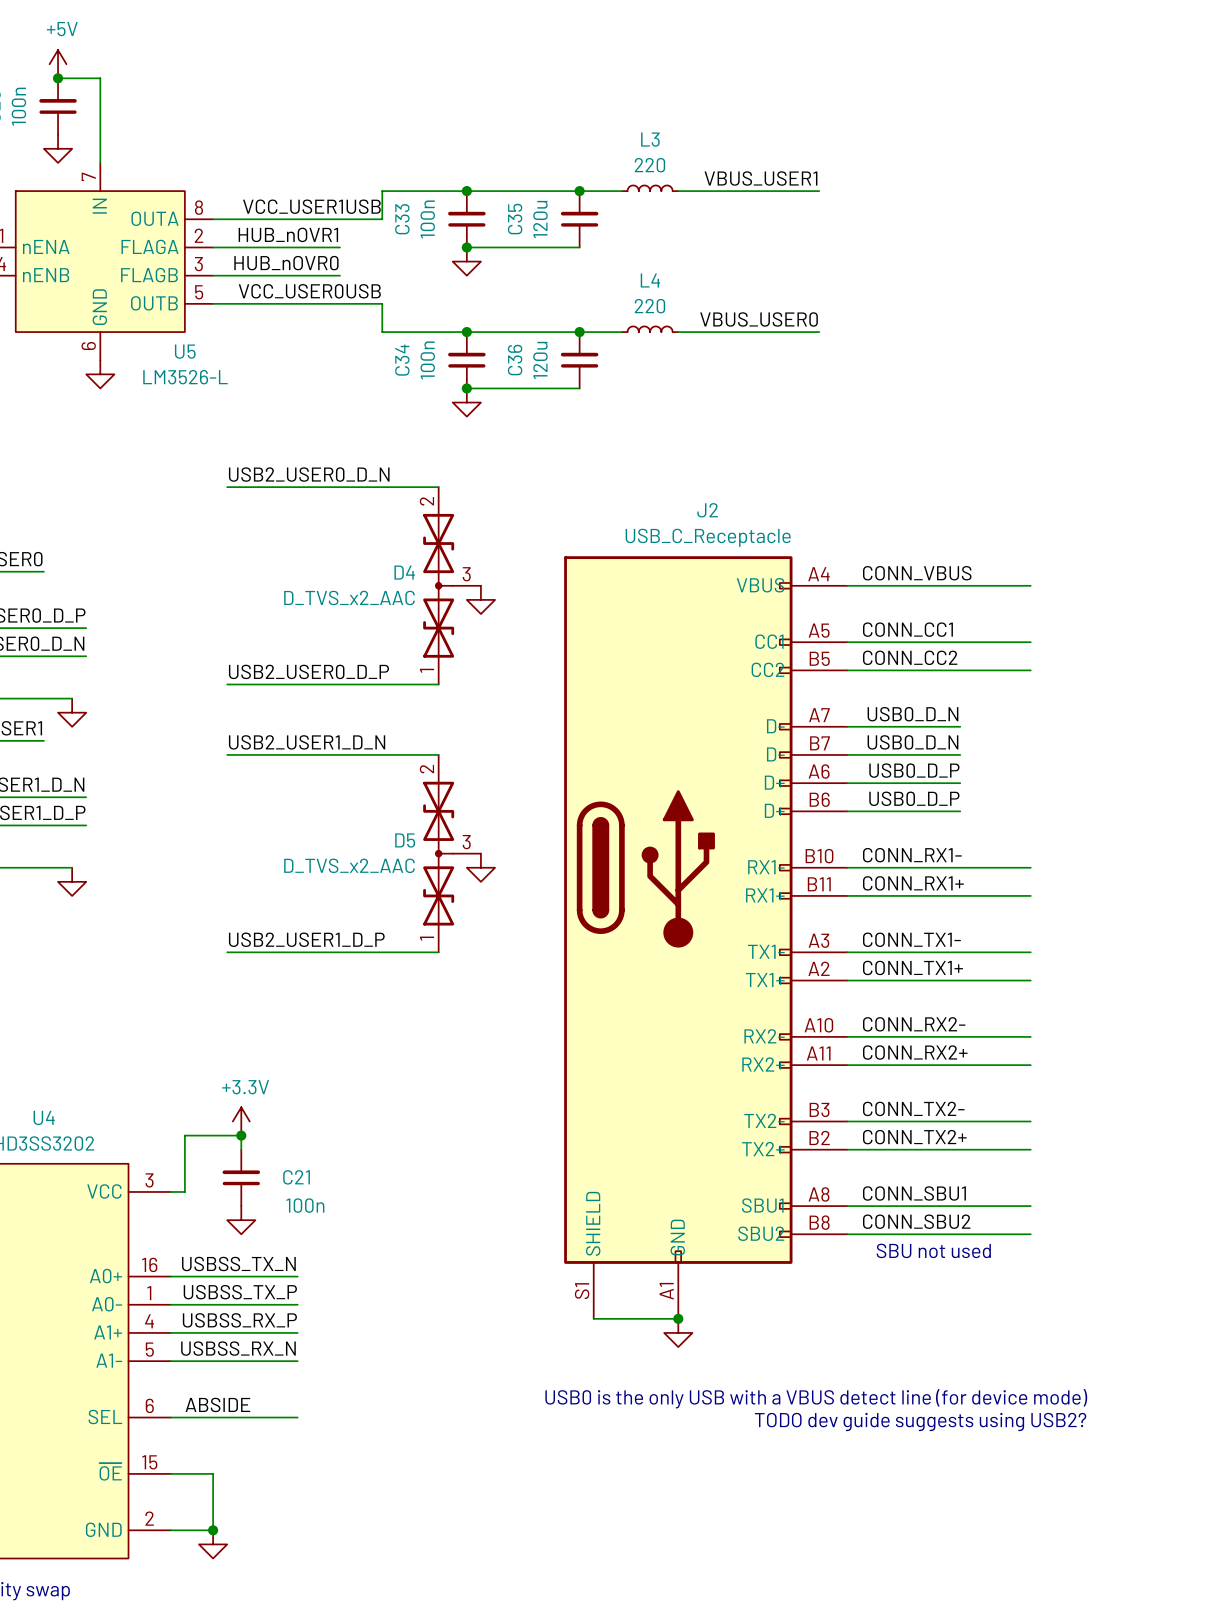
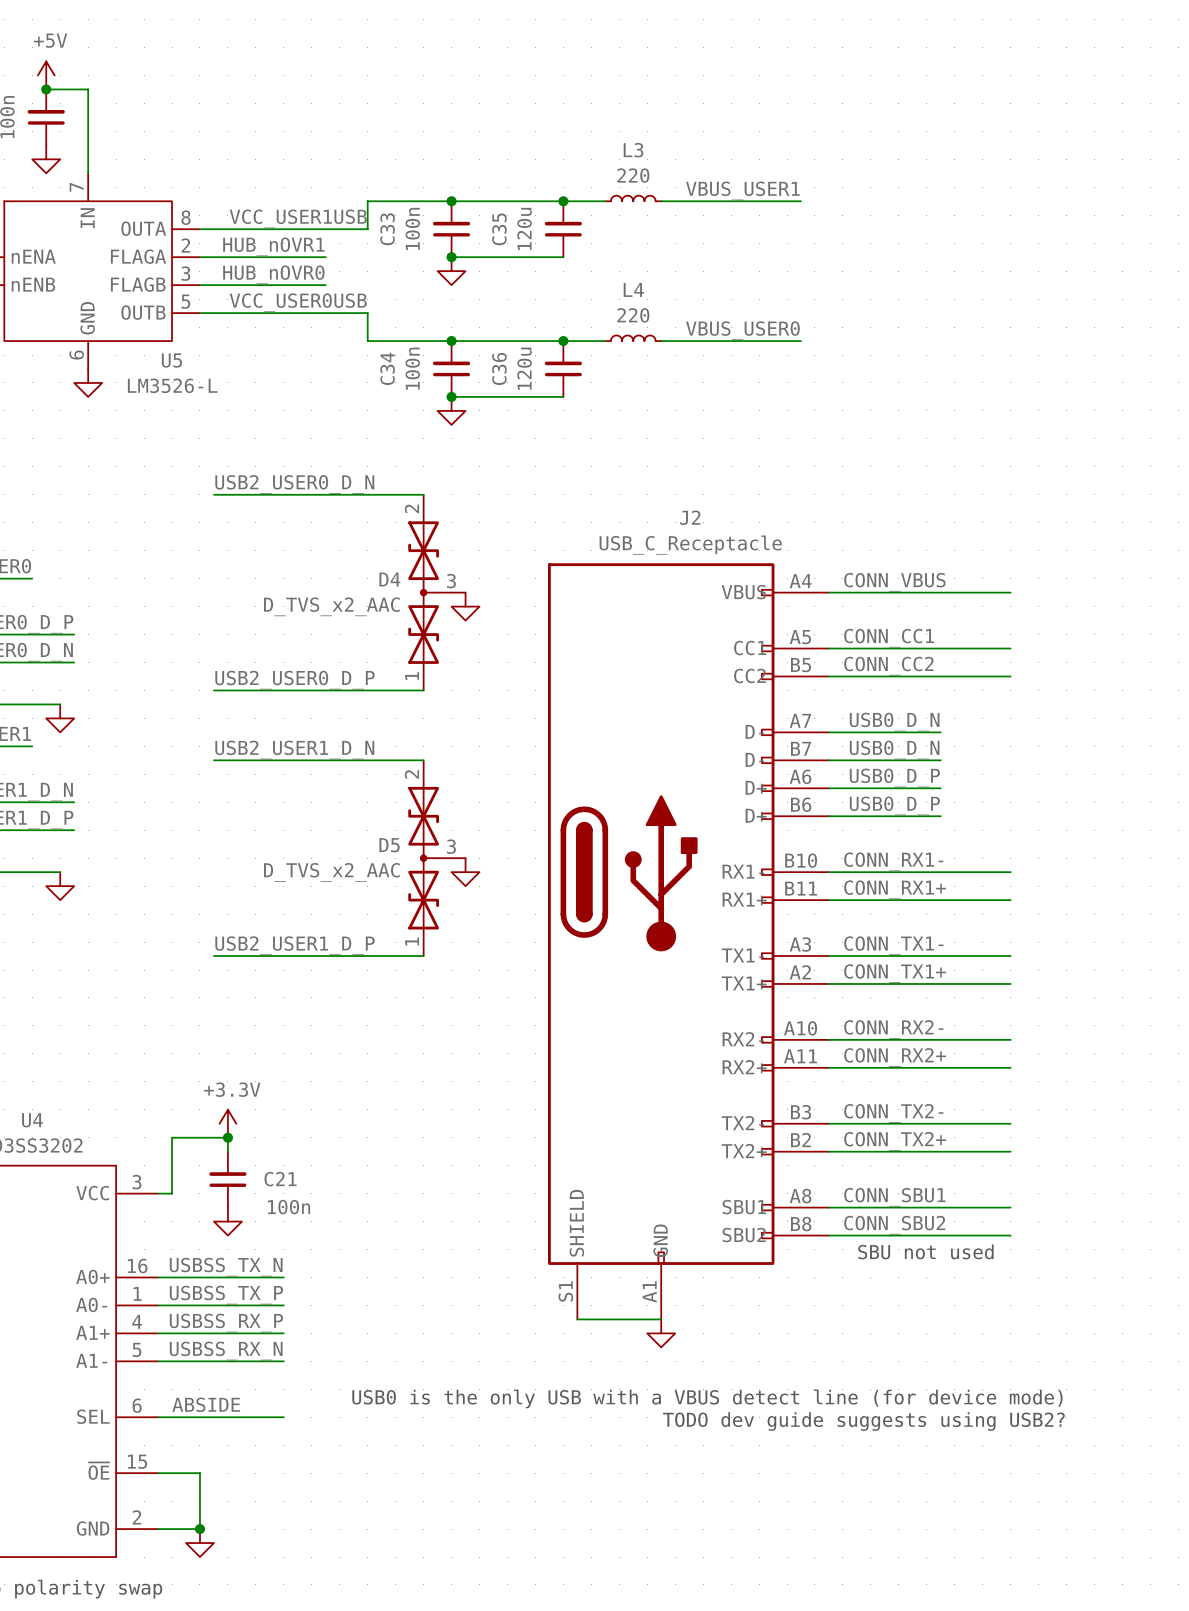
junction: (678, 1318) -> none

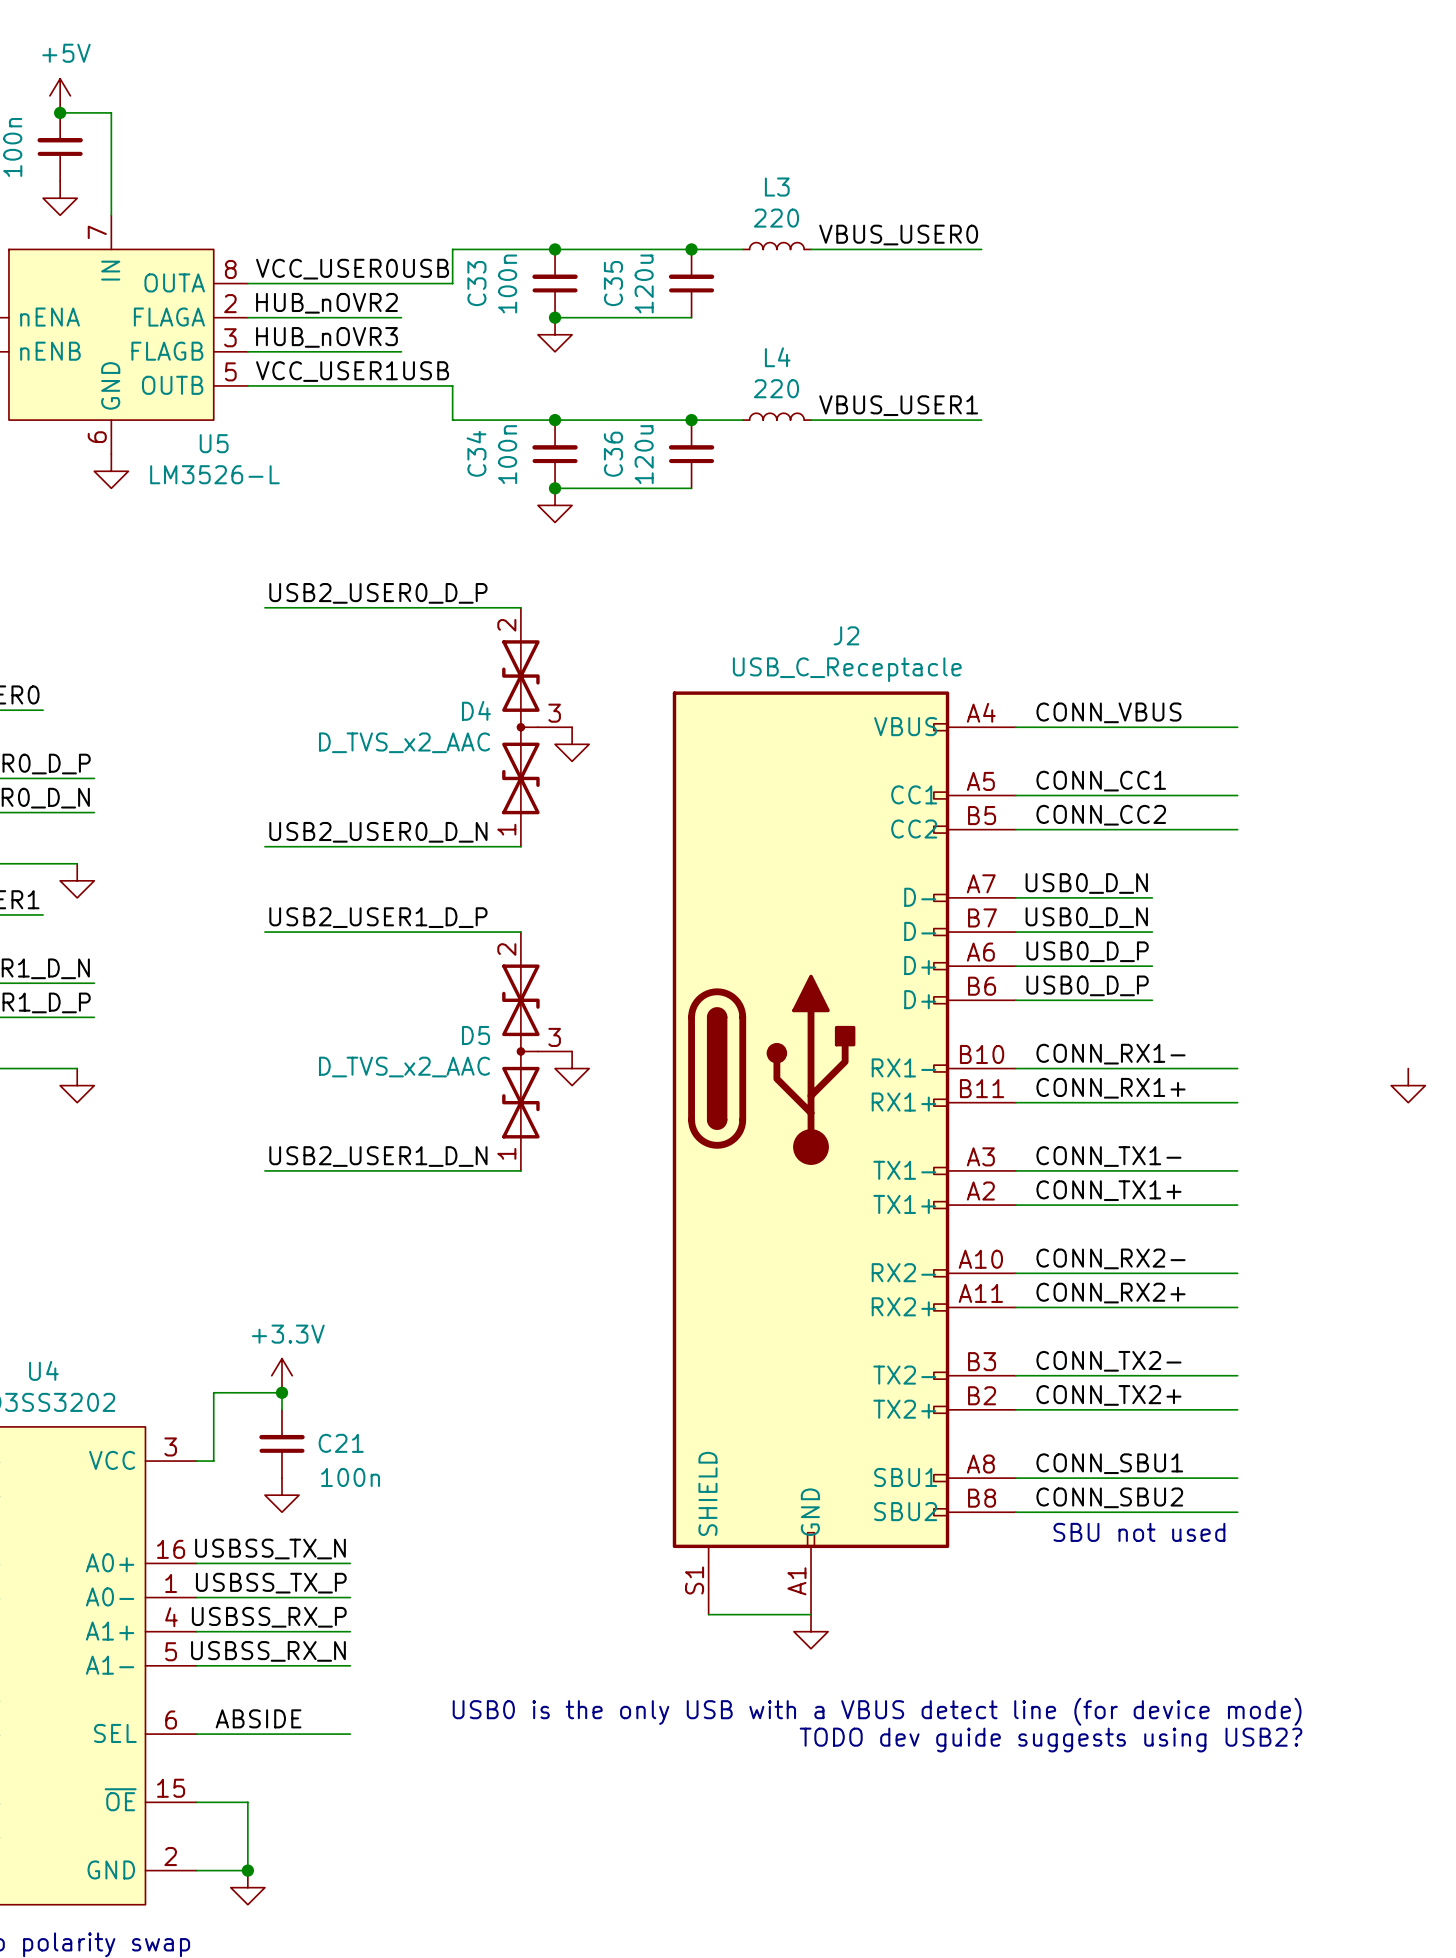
label: VBUS_USER1 (742, 190) -> VBUS_USER0 (898, 235)
label: VCC_USER1USB (298, 218) -> VCC_USER0USB (352, 269)
label: HUB_nOVR1 (273, 246) -> HUB_nOVR2 (326, 303)
label: HUB_nOVR0 (273, 274) -> HUB_nOVR3 (326, 337)
label: VCC_USER0USB (298, 302) -> VCC_USER1USB (352, 371)
label: VBUS_USER0 (742, 330) -> VBUS_USER1 (898, 405)
label: USB2_USER0_D_N (294, 484) -> USB2_USER0_D_P (378, 593)
label: USB2_USER0_D_P (295, 680) -> USB2_USER0_D_N (378, 832)
label: USB2_USER1_D_N (294, 750) -> USB2_USER1_D_P (378, 917)
power symbol: none -> (1408, 1085)
label: USB2_USER1_D_P (295, 945) -> USB2_USER1_D_N (378, 1156)

